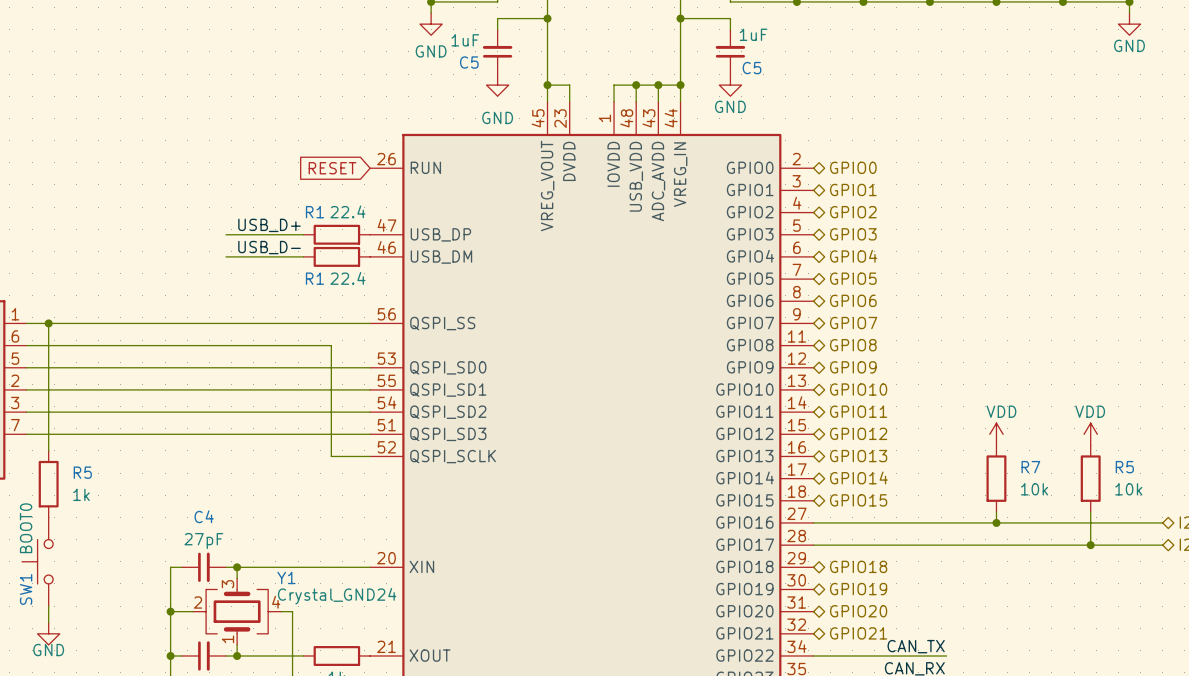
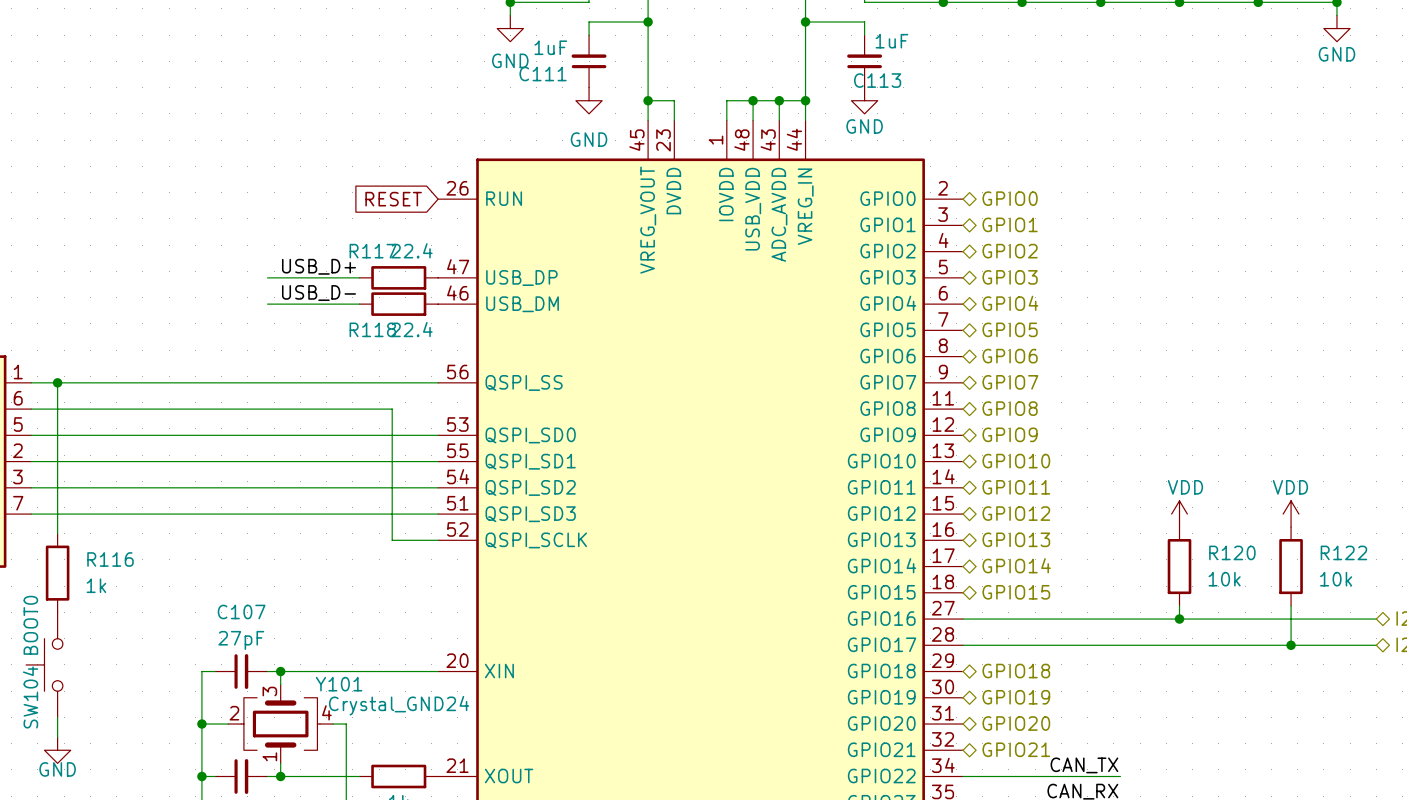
C5 name: C5 (469, 62) -> C111 (543, 73)
C5 name: C5 (751, 68) -> C113 (877, 80)
R1 name: R1 (314, 212) -> R117 (373, 251)
R1 name: R1 (314, 278) -> R118 (372, 329)
R7 name: R7 (1030, 467) -> R120 (1232, 552)
R5 name: R5 (1124, 467) -> R122 (1343, 552)
R5 name: R5 (82, 472) -> R116 (110, 559)
C4 name: C4 (204, 516) -> C107 (241, 611)
Y1 name: Y1 (286, 577) -> Y101 (339, 684)
SW1 name: SW1 (26, 589) -> SW104 (30, 697)

